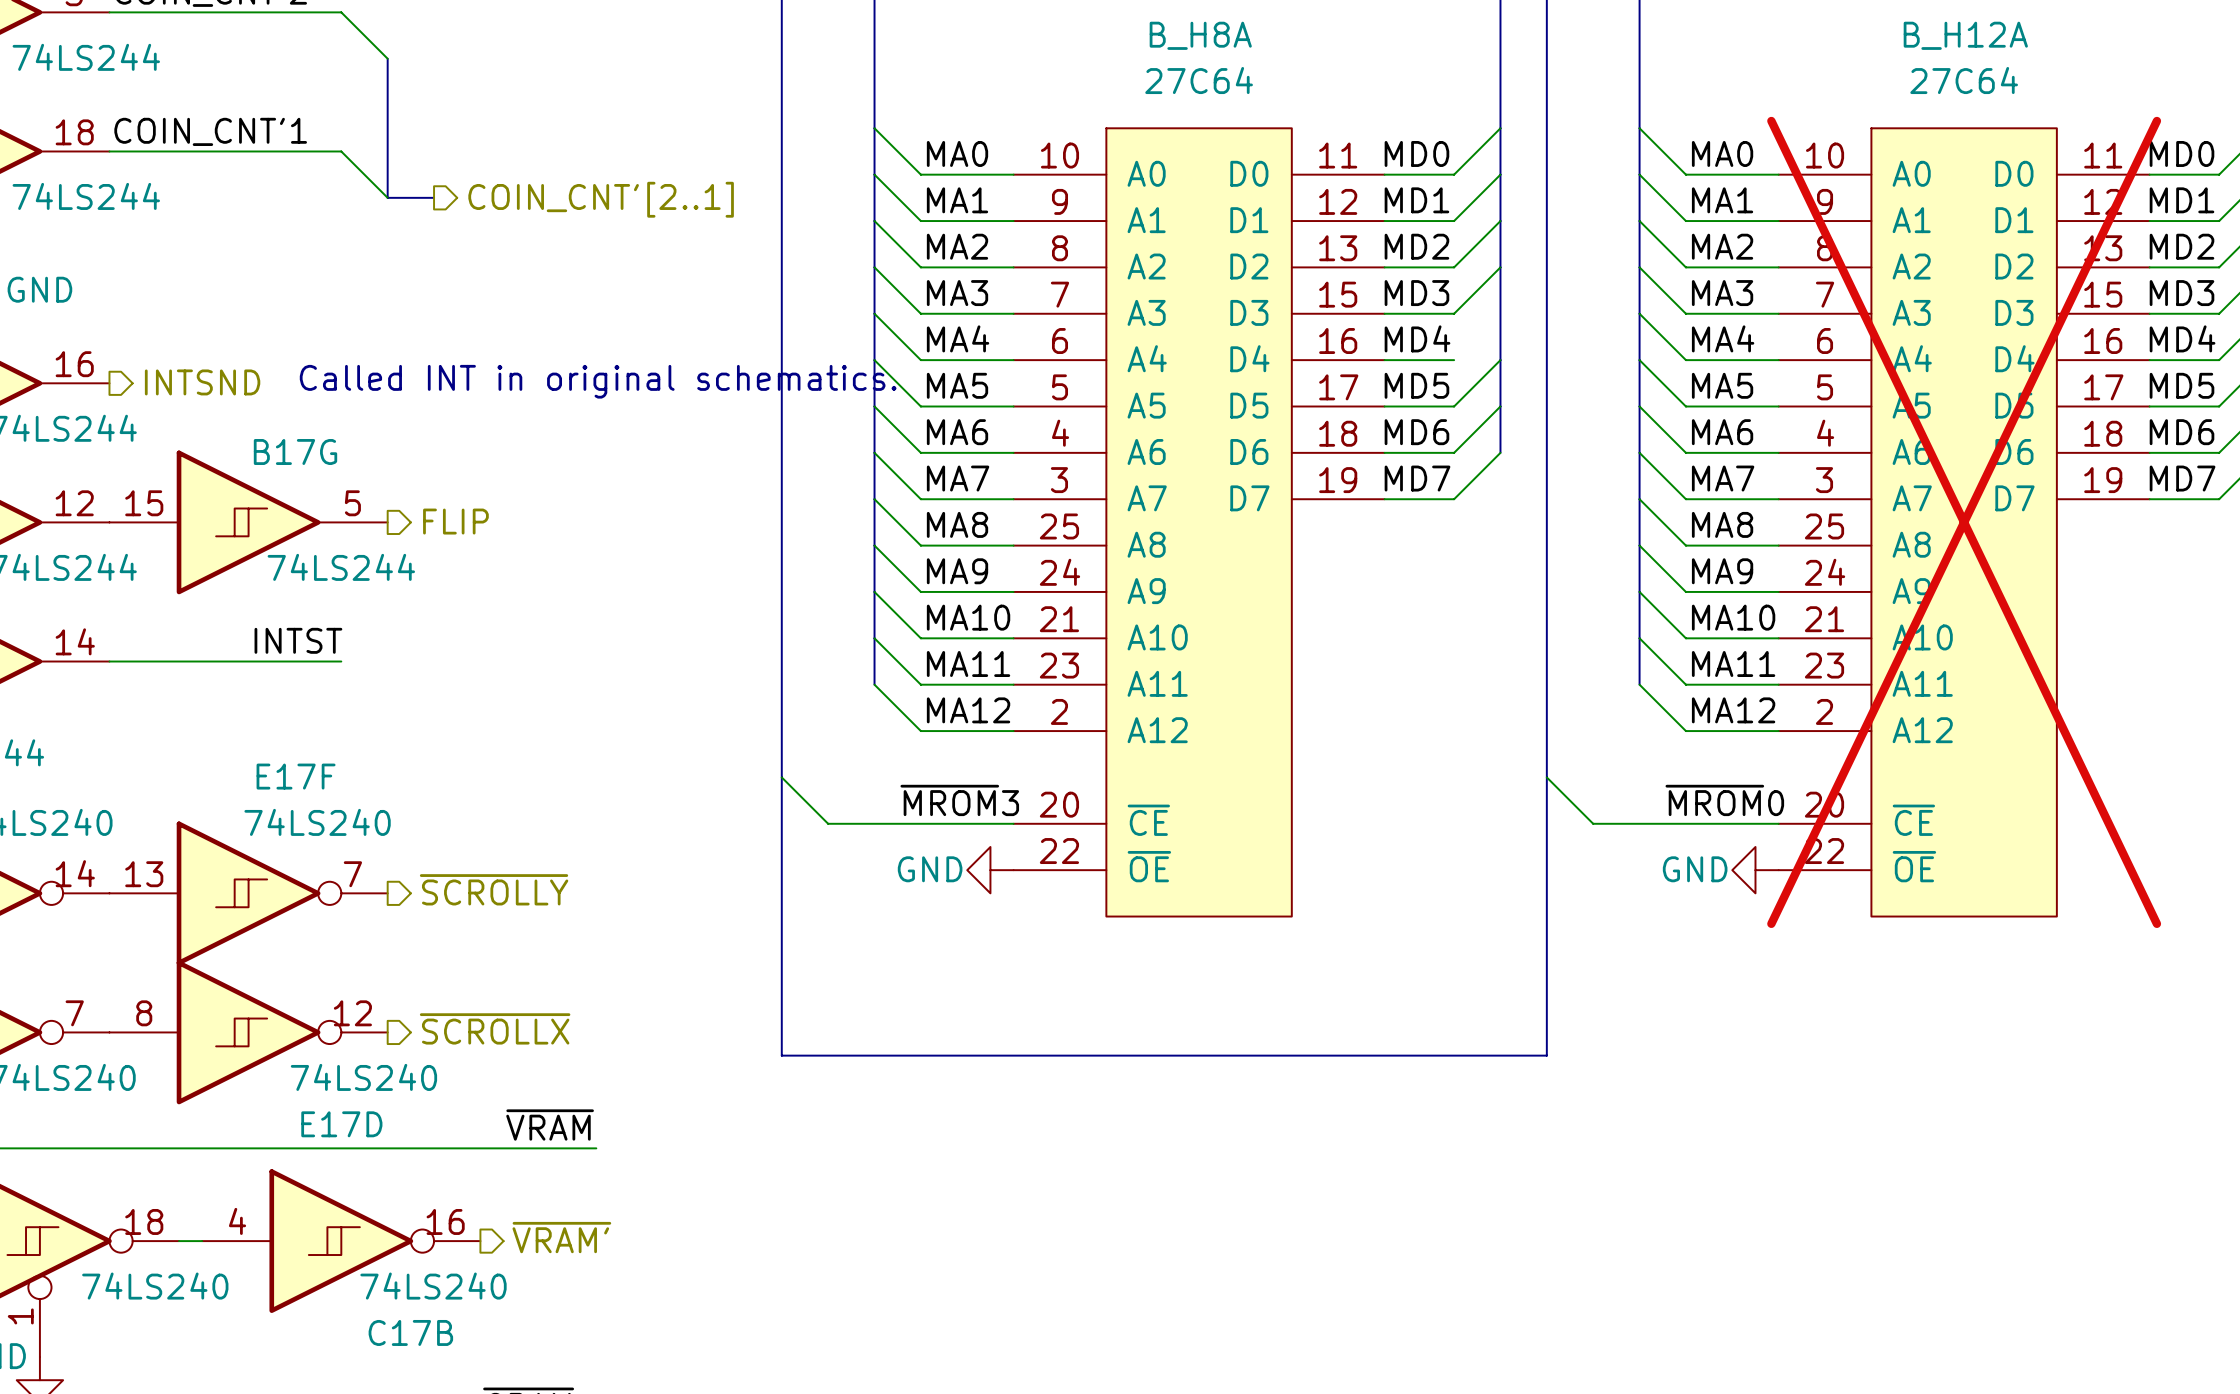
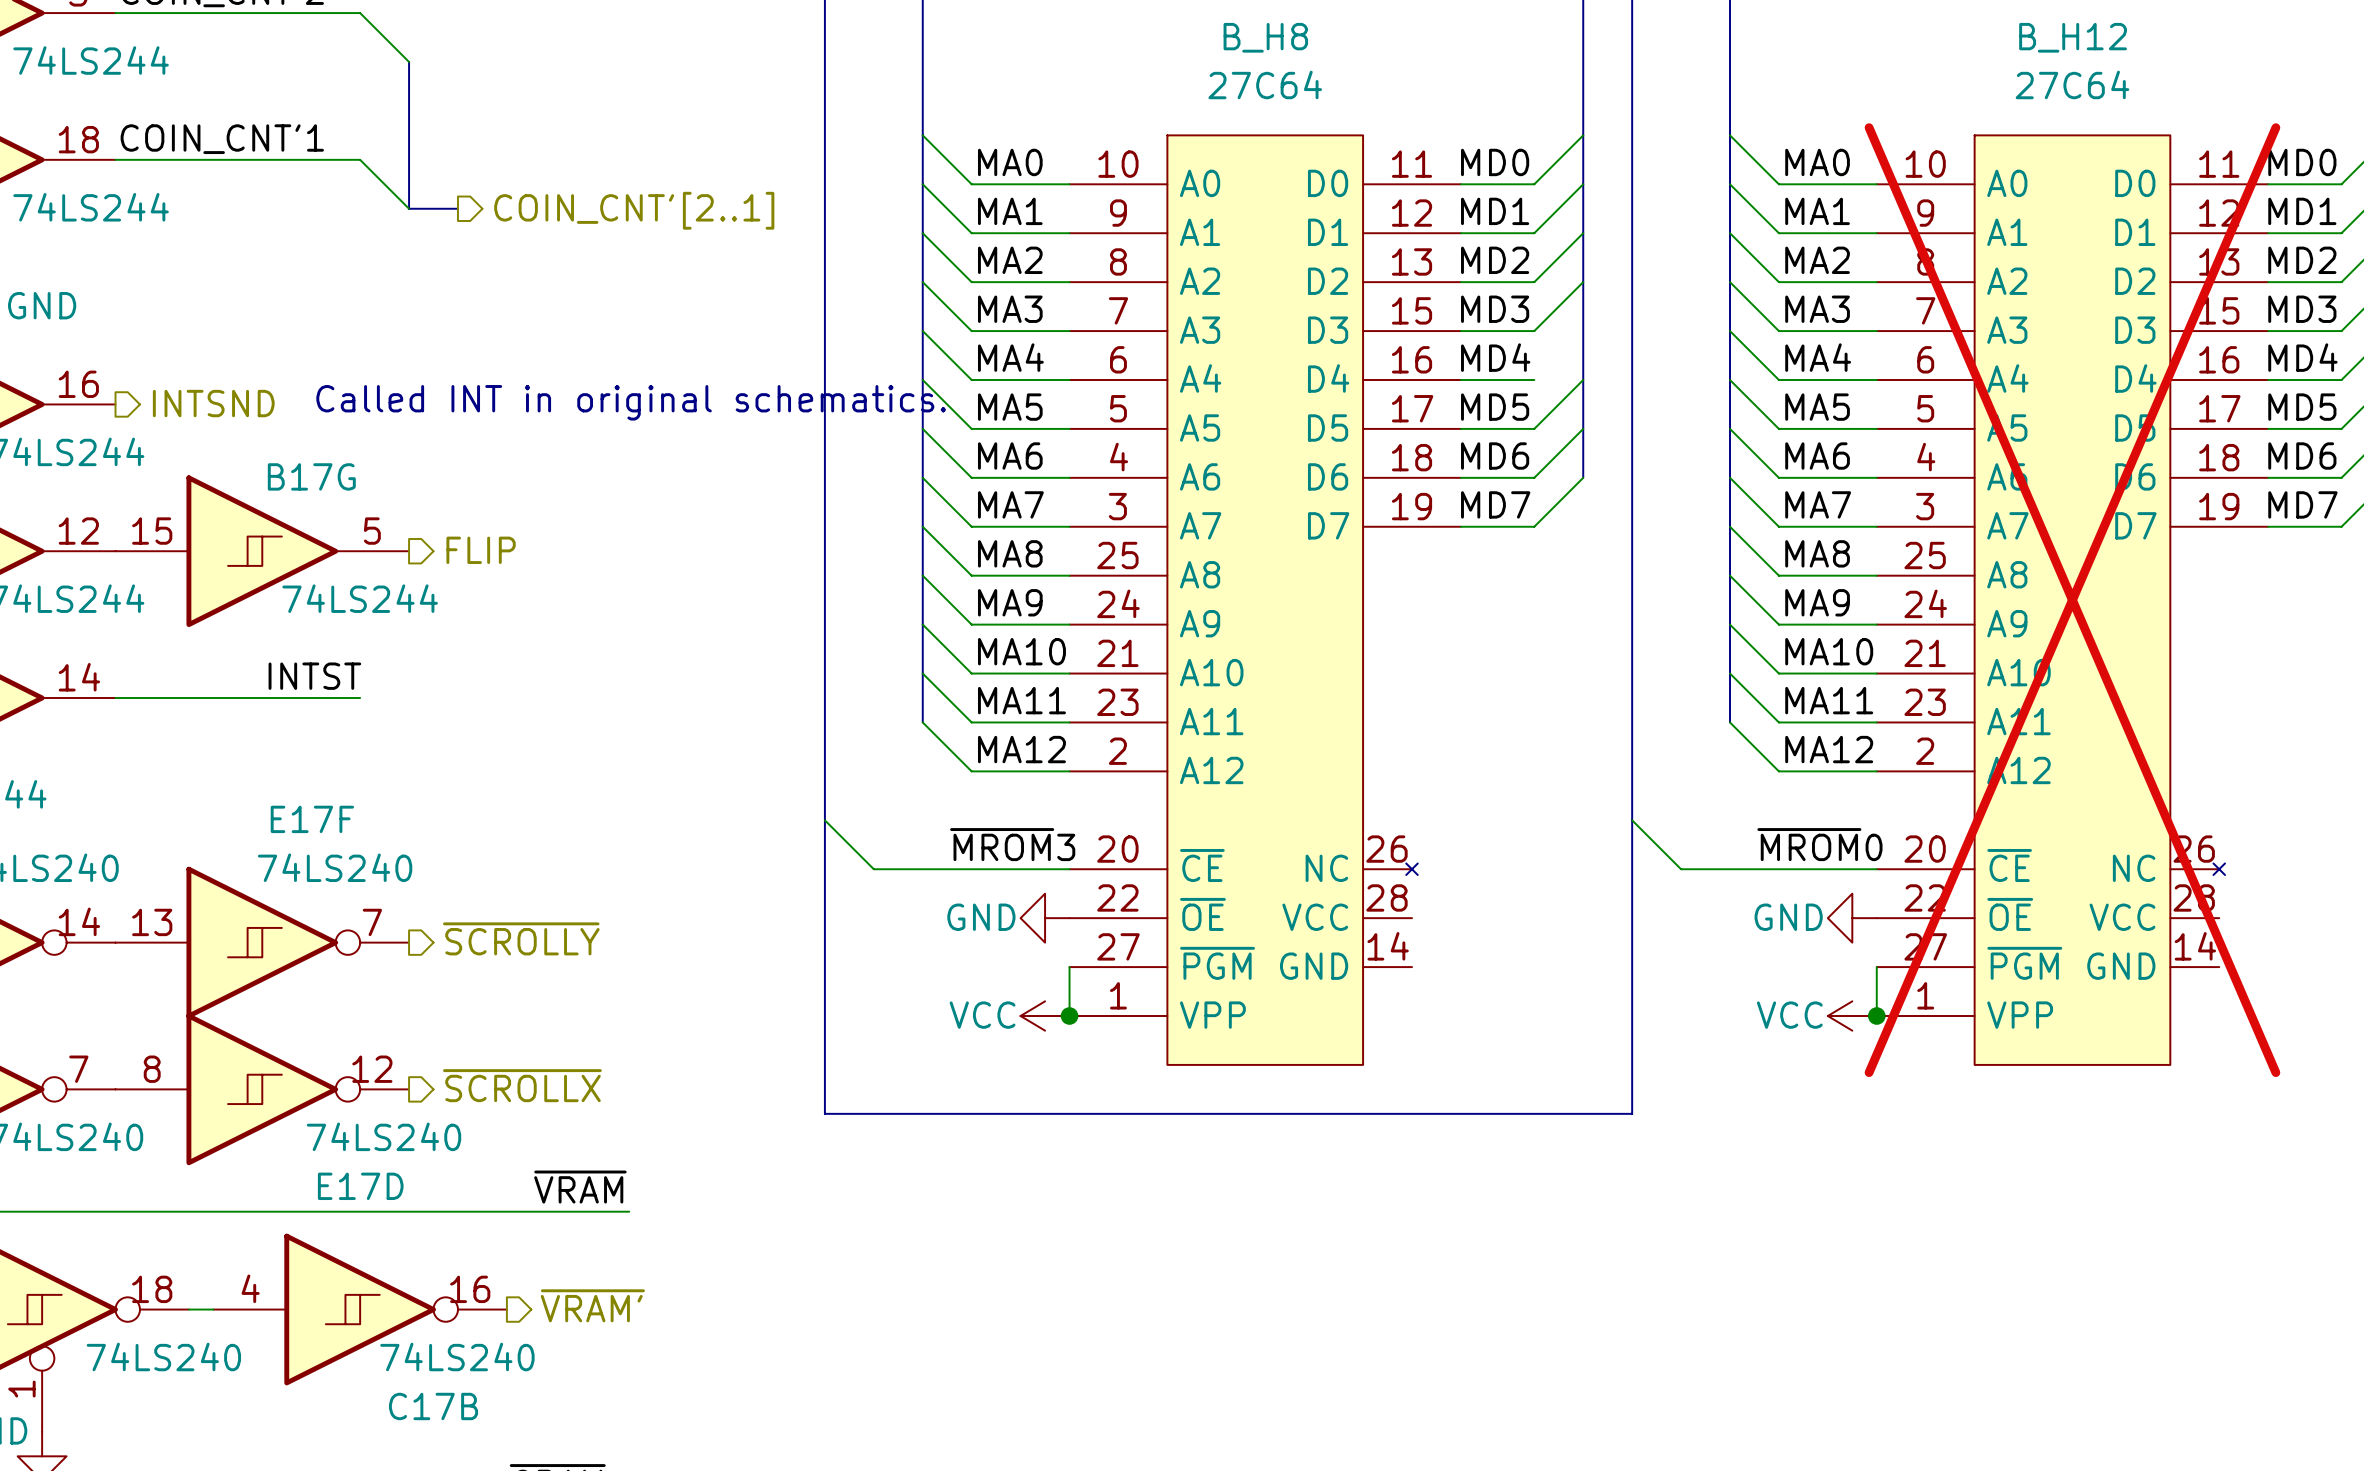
B_H8A: 27C64 (1199, 522) -> none
B_H12A: 27C64 (1964, 522) -> none
B_H8: none -> 27C64 (1265, 600)
B_H12: none -> 27C64 (2072, 600)
wire: none -> (1069, 967) (1069, 1016)
wire: none -> (1876, 967) (1876, 1016)
power symbol: none -> VCC (1045, 1016)
junction: none -> (1069, 1016)
power symbol: none -> VCC (1852, 1016)
junction: none -> (1876, 1016)

